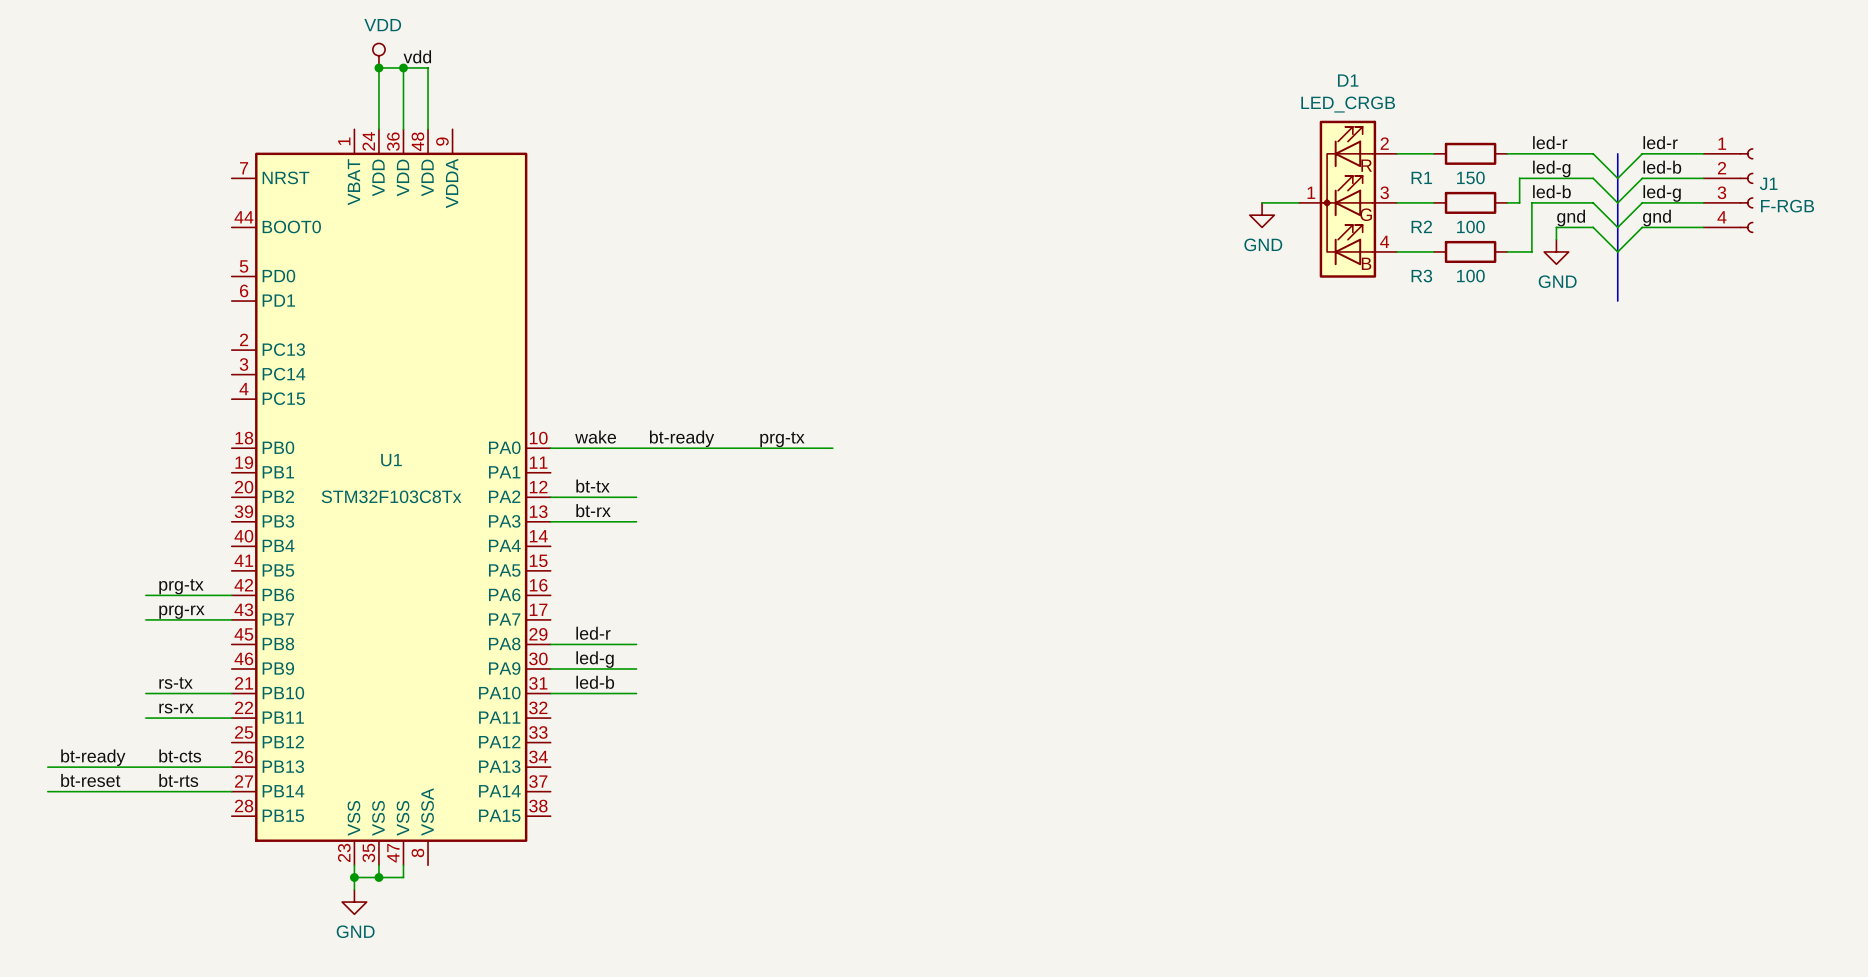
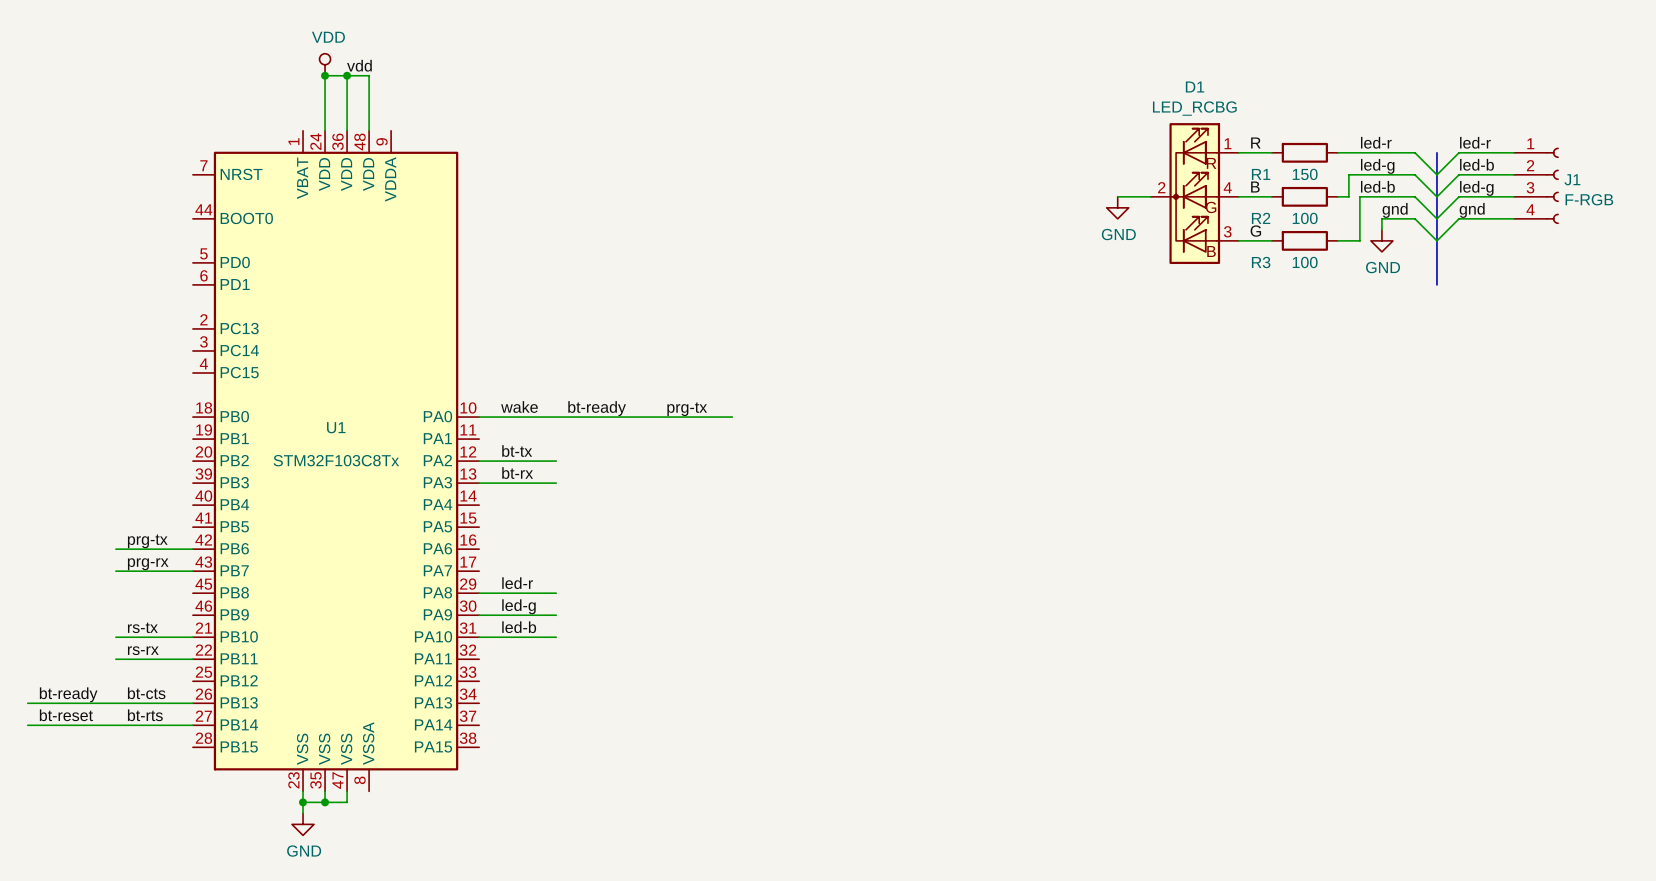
D1 value: LED_CRGB (1348, 104) -> LED_RCBG (1194, 108)
D1 symbol: [1298, 120, 1397, 278] -> [1150, 123, 1239, 265]
label: none -> R (1255, 142)
label: none -> B (1255, 187)
label: none -> G (1255, 231)

